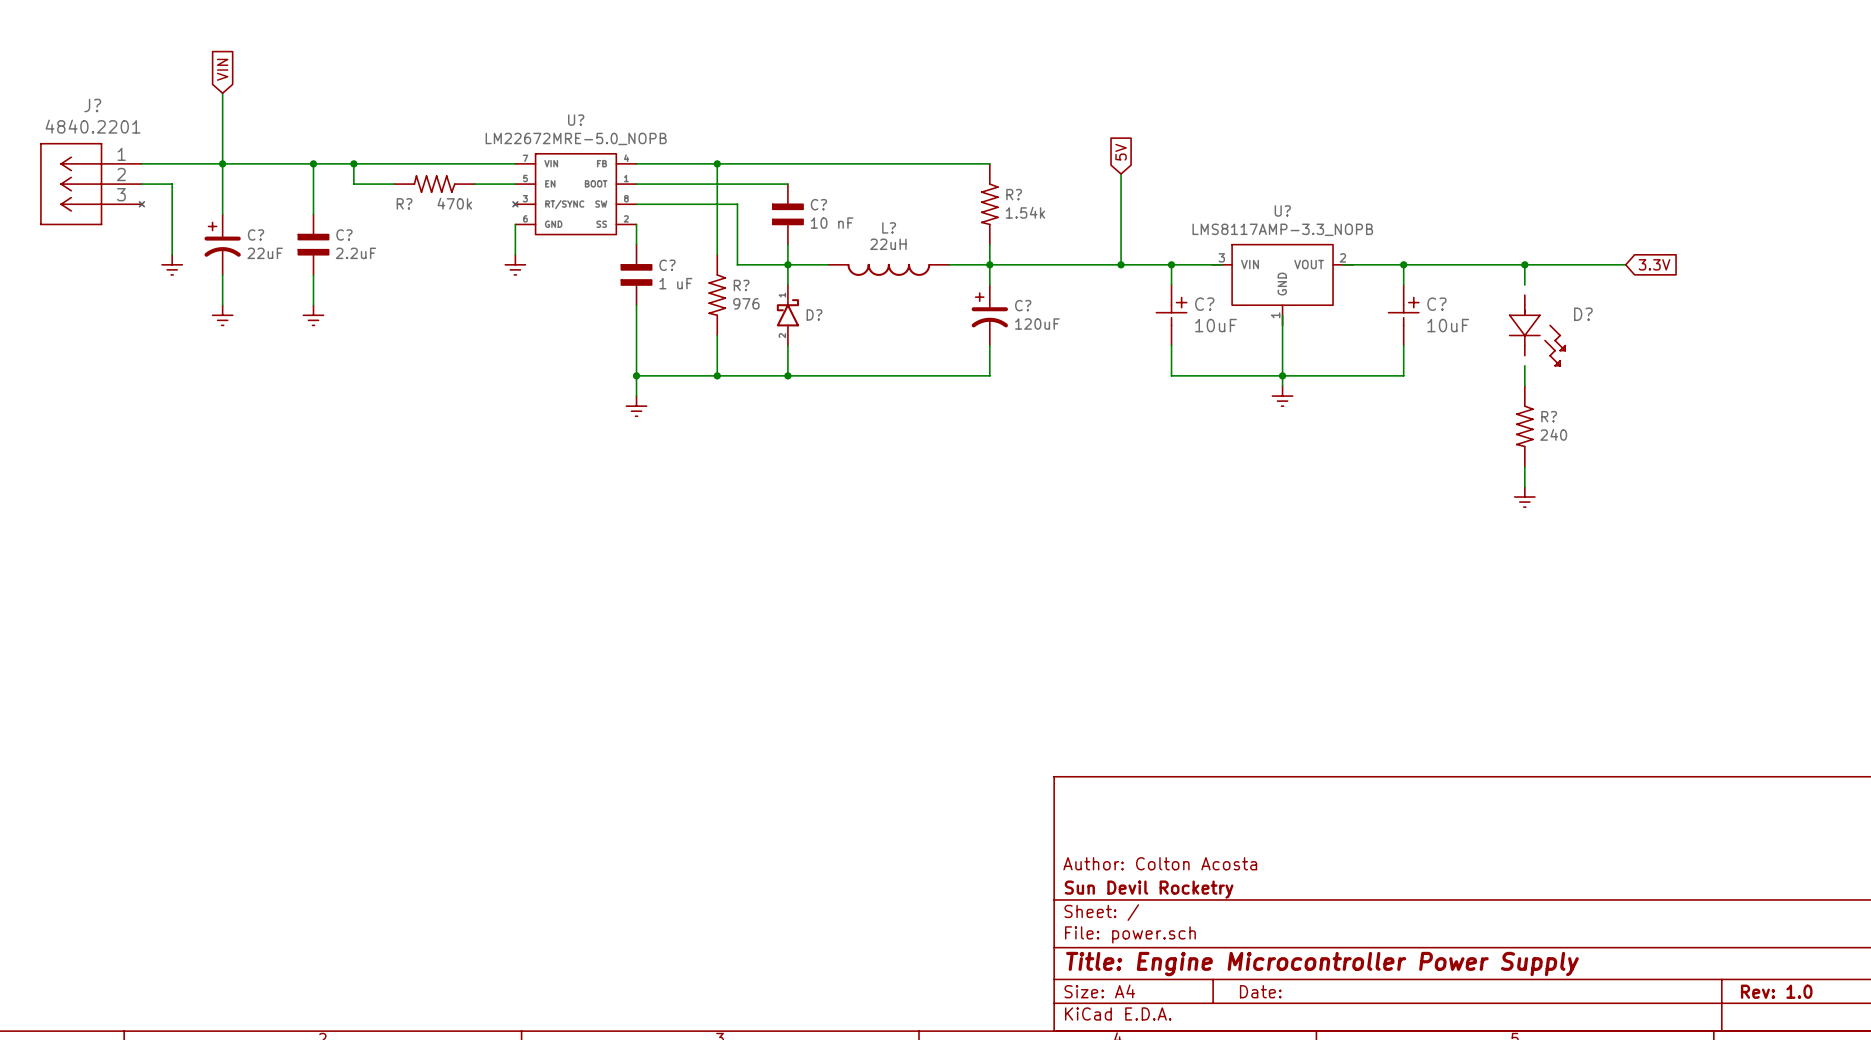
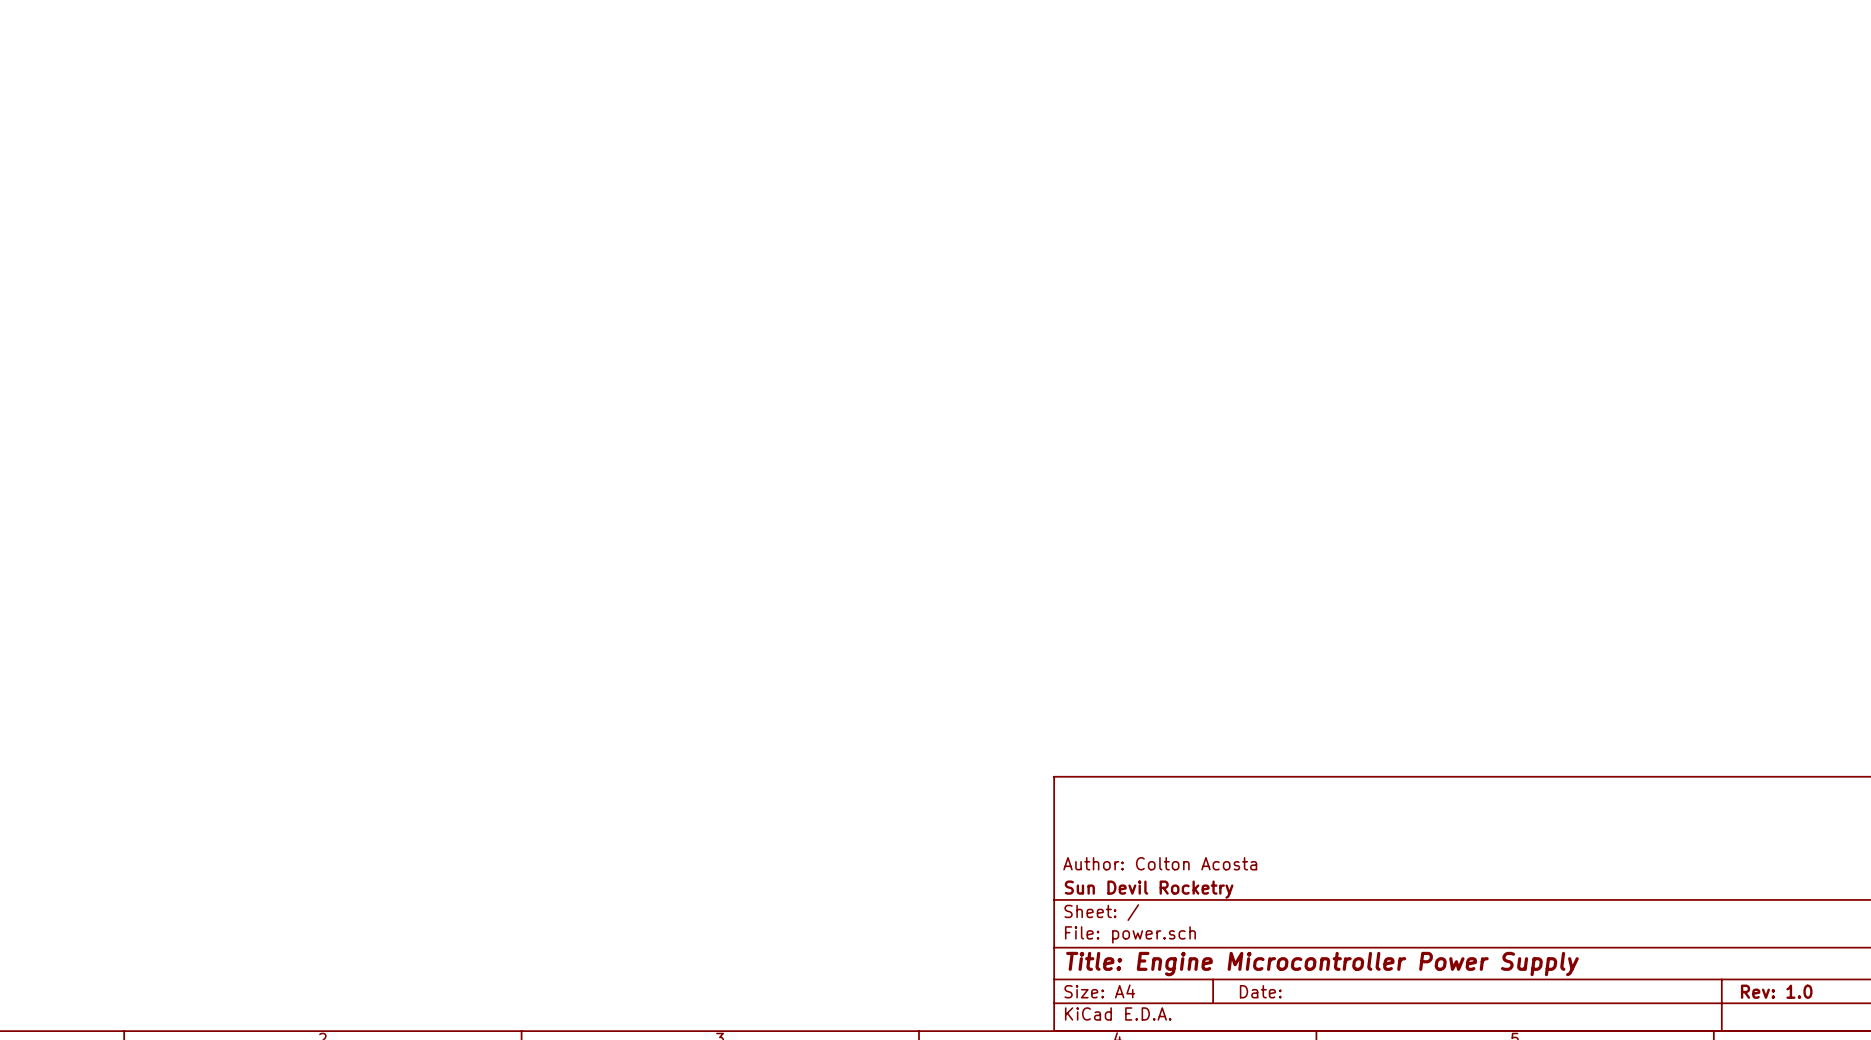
global label: VIN (222, 69) -> none
wire: (222, 93) (222, 214) -> none
global label: 5V (1121, 152) -> none
wire: (141, 163) (515, 163) -> none
junction: (222, 163) -> none
wire: (313, 163) (313, 214) -> none
junction: (313, 163) -> none
wire: (353, 163) (353, 184) (394, 184) -> none
junction: (353, 163) -> none
wire: (636, 163) (989, 163) -> none
wire: (717, 163) (717, 254) -> none
junction: (717, 163) -> none
wire: (1121, 173) (1121, 264) -> none
J?: 4840.2201 (92, 184) -> none
wire: (141, 184) (172, 184) (172, 254) -> none
R?: 470k (434, 184) -> none
wire: (475, 184) (515, 184) -> none
wire: (636, 184) (787, 184) -> none
U?: LM22672MRE-5.0_NOPB (574, 194) -> none
wire: (636, 204) (737, 204) (737, 264) (828, 264) -> none
R?: 1.54k (989, 204) -> none
C?: 10 nF (787, 214) -> none
wire: (515, 224) (515, 254) -> none
wire: (636, 224) (636, 244) -> none
C?: 22uF (222, 244) -> none
C?: 2.2uF (313, 244) -> none
wire: (787, 244) (787, 285) -> none
wire: (989, 244) (989, 285) -> none
power symbol: (172, 264) -> none
power symbol: (515, 264) -> none
junction: (787, 264) -> none
wire: (949, 264) (1221, 264) -> none
junction: (989, 264) -> none
junction: (1121, 264) -> none
wire: (1171, 264) (1171, 285) -> none
junction: (1171, 264) -> none
wire: (1343, 264) (1625, 264) -> none
wire: (1403, 264) (1403, 285) -> none
junction: (1403, 264) -> none
wire: (1524, 264) (1524, 285) -> none
junction: (1524, 264) -> none
global label: 3.3V (1654, 264) -> none
L?: 22uH (888, 269) -> none
wire: (222, 274) (222, 305) -> none
wire: (313, 274) (313, 305) -> none
C?: 1 uF (636, 274) -> none
U?: LMS8117AMP-3.3_NOPB (1282, 285) -> none
R?: 976 (717, 295) -> none
wire: (636, 305) (636, 396) -> none
power symbol: (222, 315) -> none
power symbol: (313, 315) -> none
D?: (787, 315) -> none
C?: 120uF (989, 315) -> none
C?: 10uF (1171, 315) -> none
wire: (1282, 315) (1282, 385) -> none
C?: 10uF (1403, 315) -> none
D?: (1537, 330) -> none
wire: (717, 335) (717, 375) -> none
wire: (787, 345) (787, 375) -> none
wire: (989, 345) (989, 375) (636, 375) -> none
wire: (1171, 345) (1171, 375) (1403, 375) (1403, 345) -> none
wire: (1524, 365) (1524, 385) -> none
junction: (636, 375) -> none
junction: (717, 375) -> none
junction: (787, 375) -> none
junction: (1282, 375) -> none
power symbol: (1282, 396) -> none
power symbol: (636, 406) -> none
R?: 240 (1524, 426) -> none
wire: (1524, 466) (1524, 486) -> none
power symbol: (1524, 497) -> none

